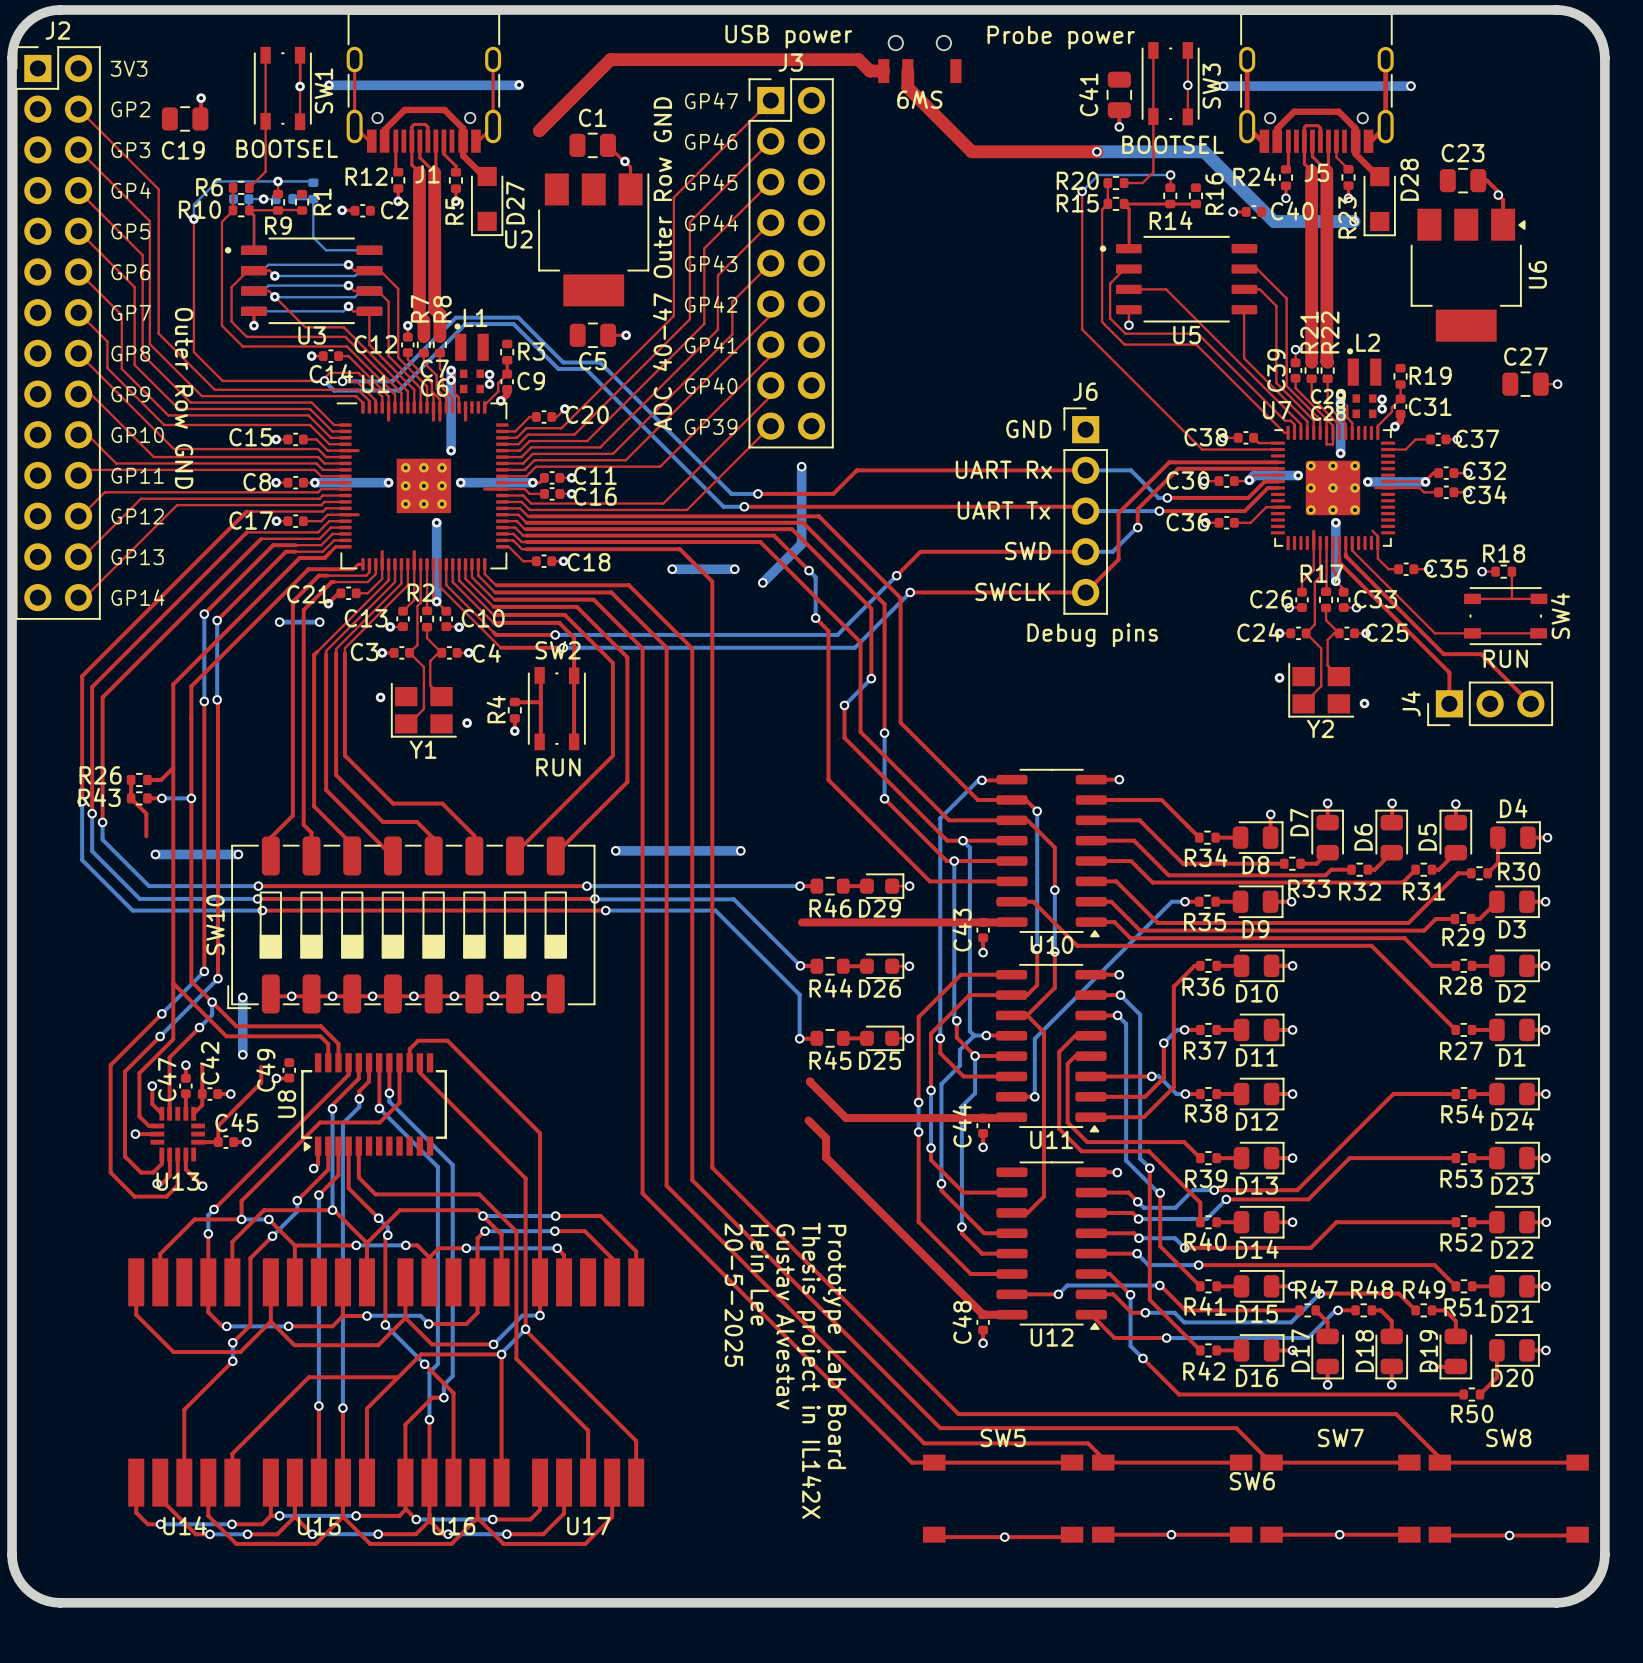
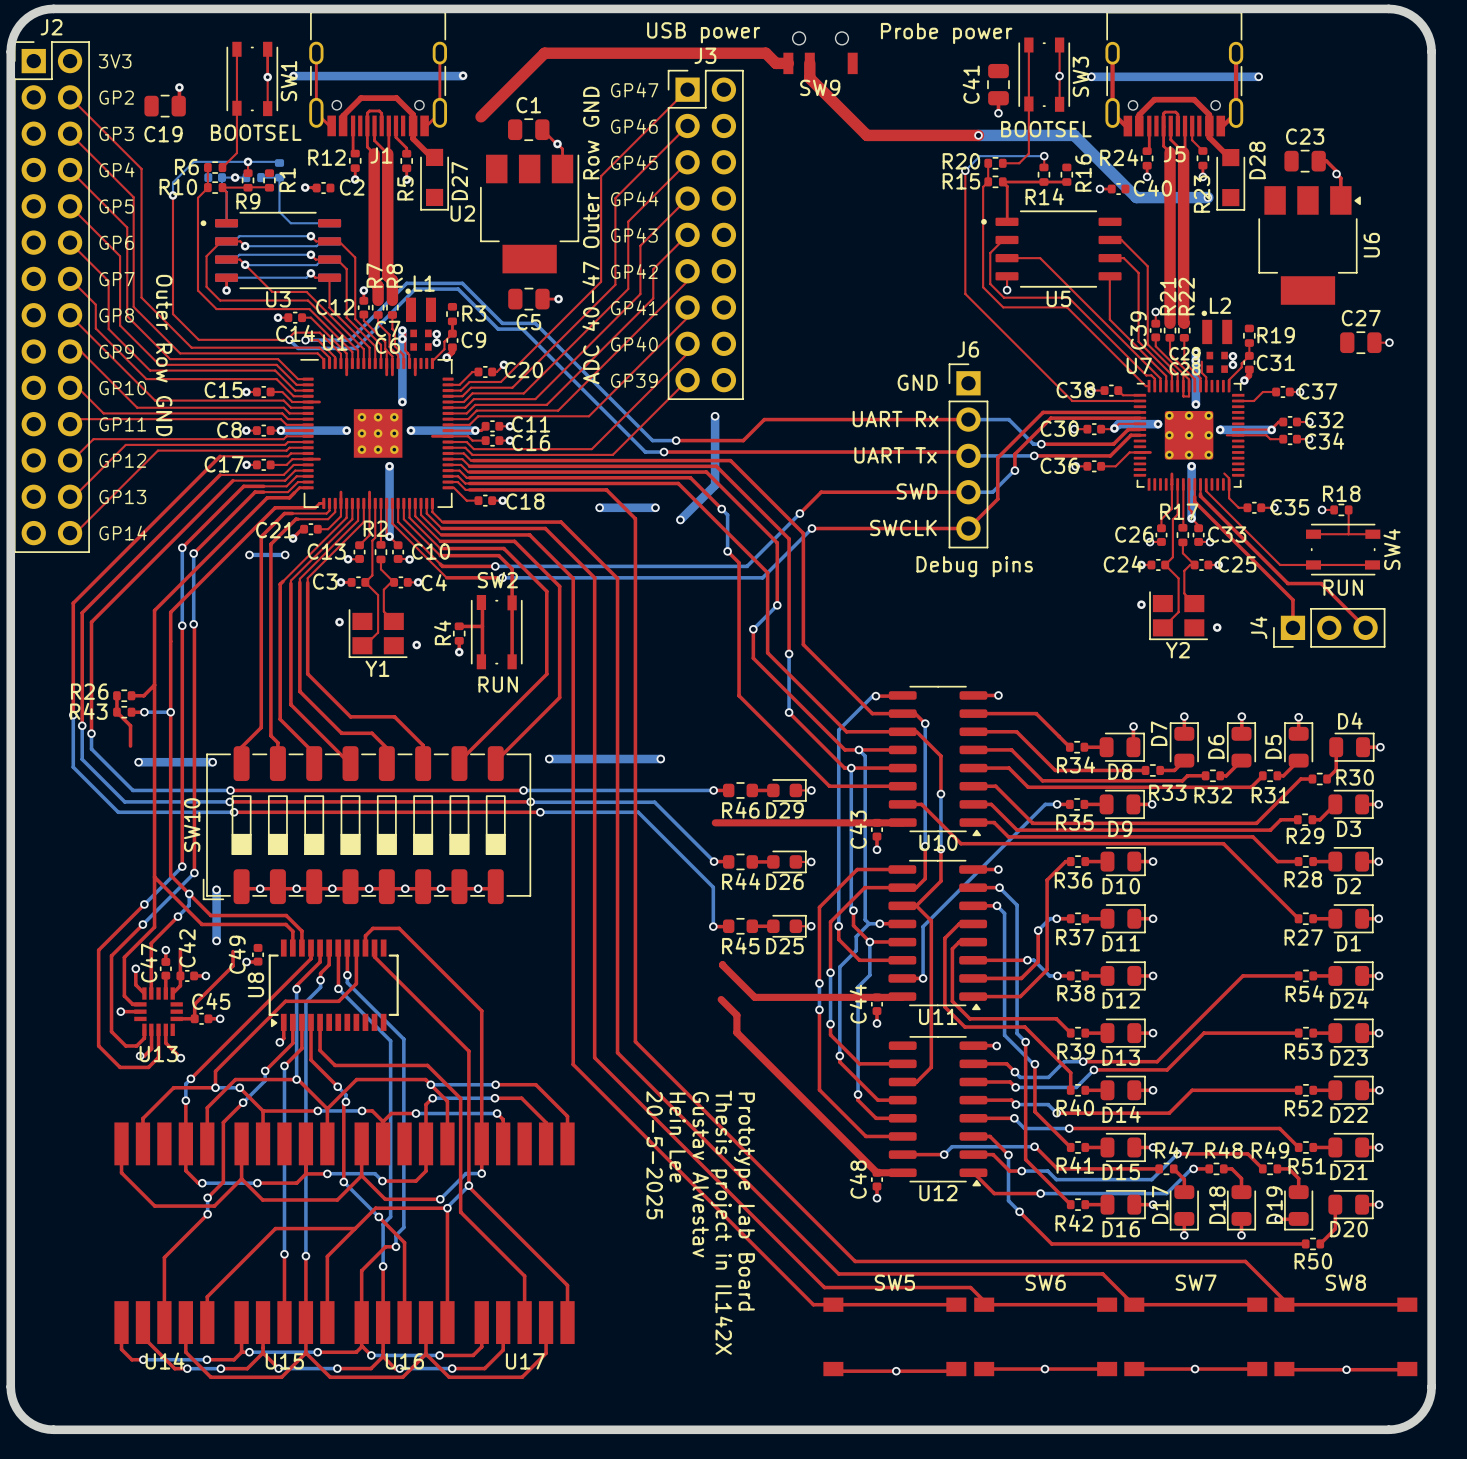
SW9 name rotation: 0° (919, 99) -> 180° (820, 87)
SW6 name position: SW6 (1252, 1481) -> SW6 (1045, 1282)

